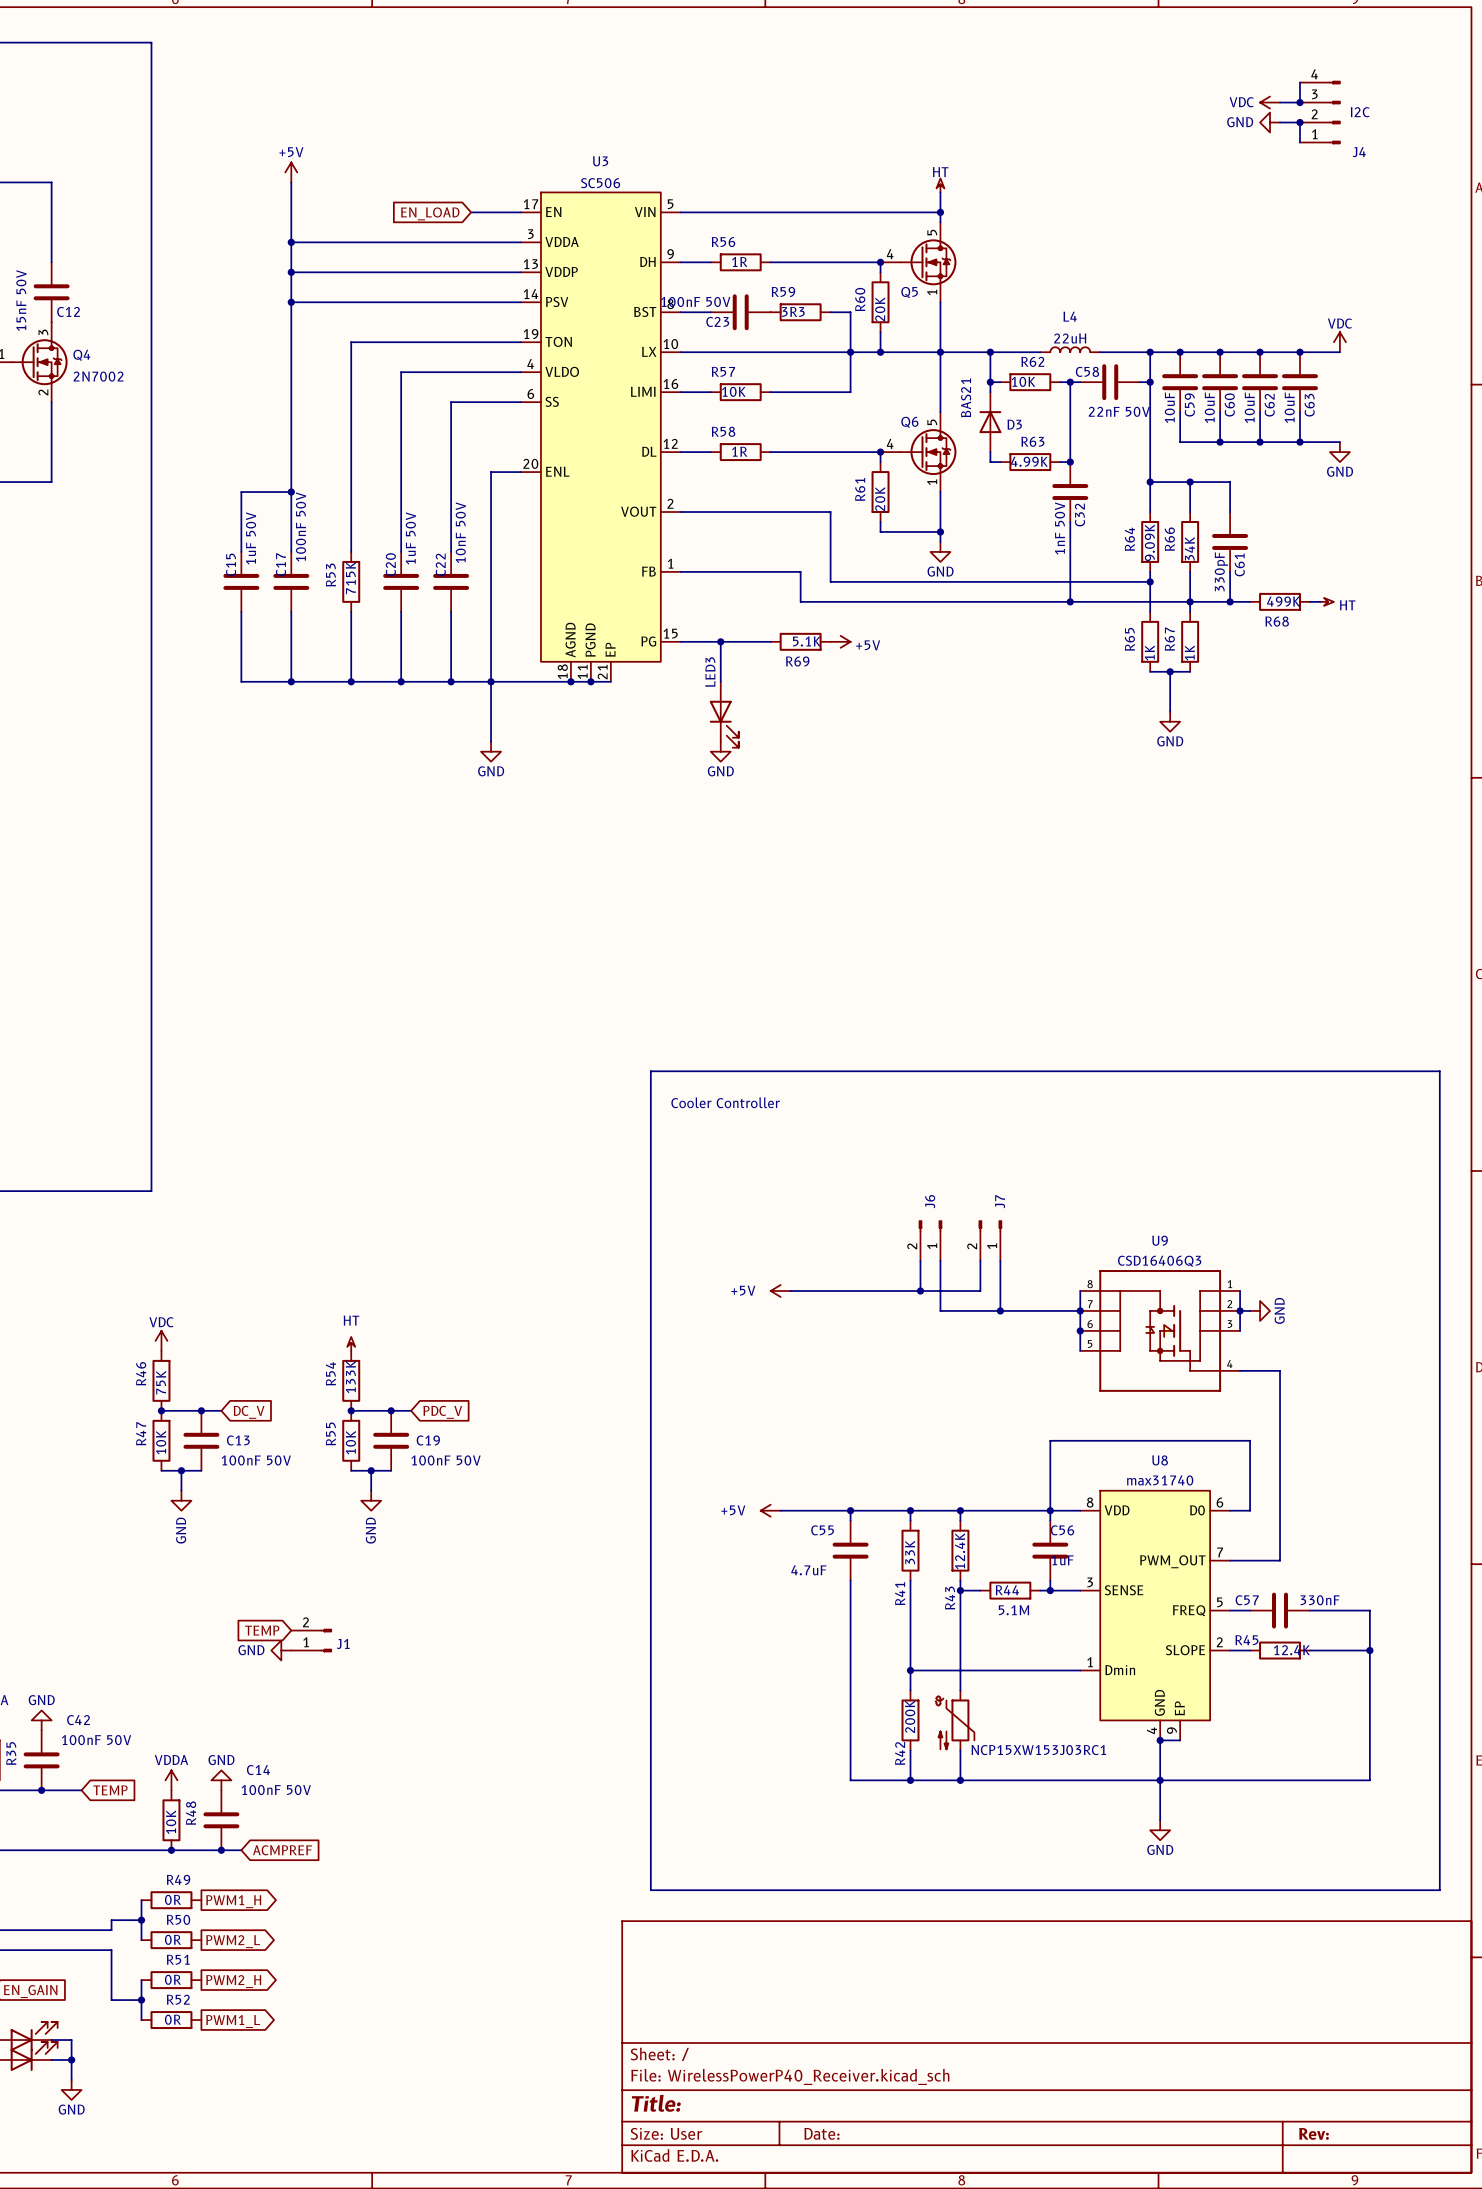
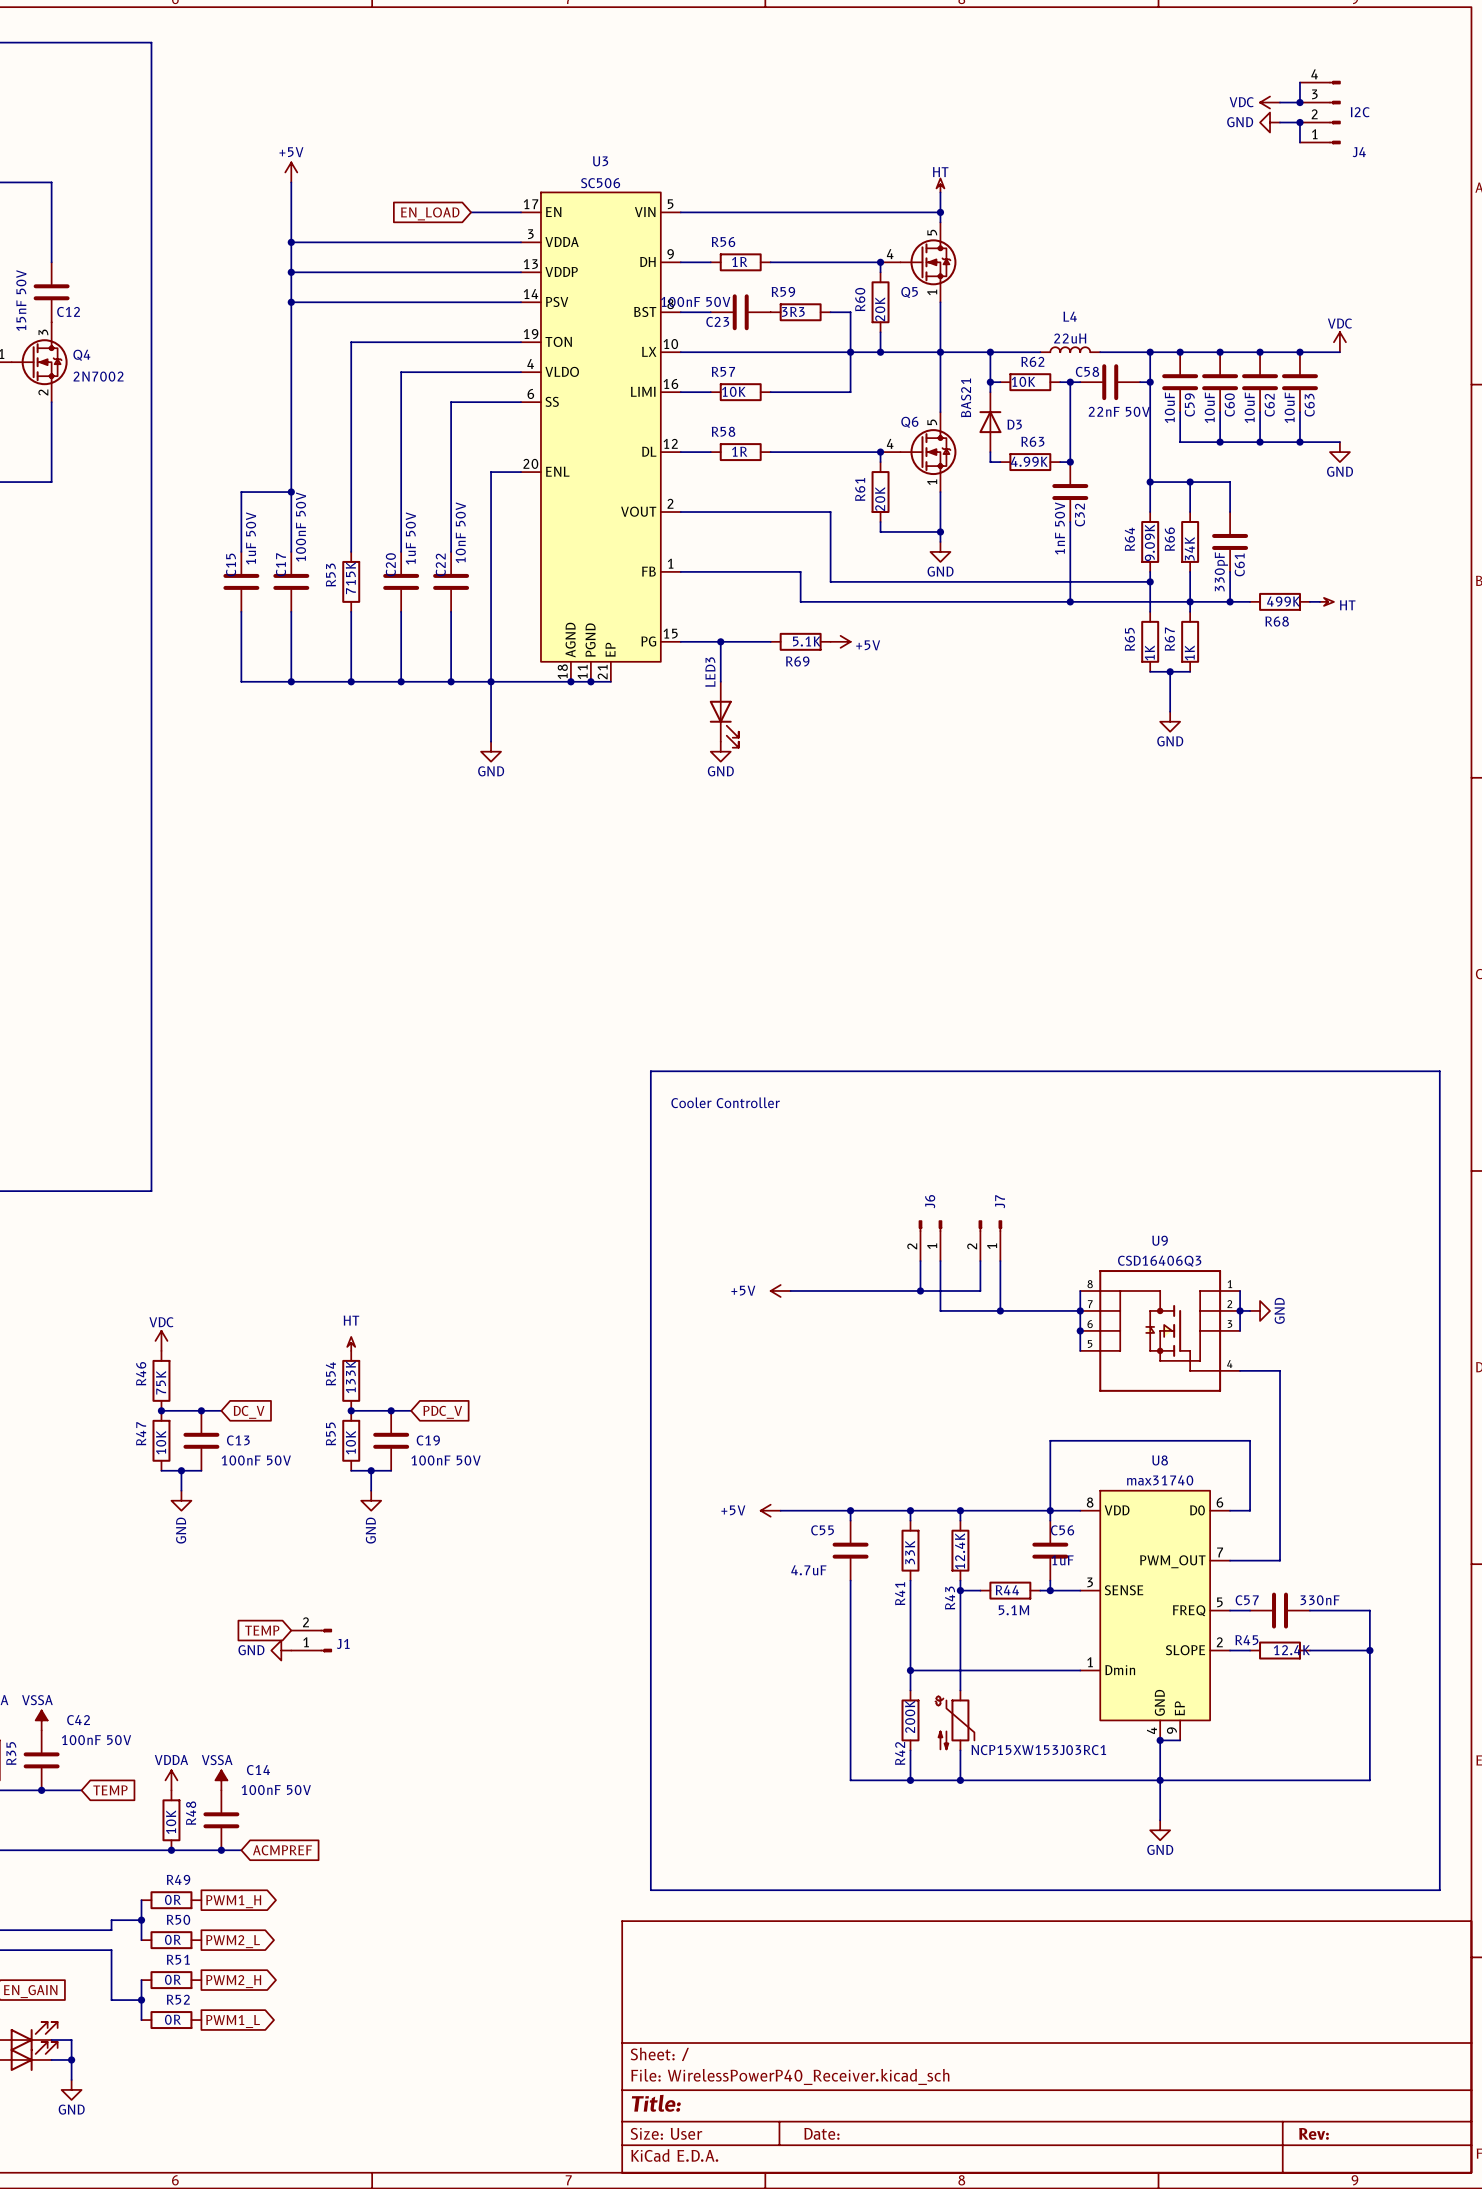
power symbol: GND (41, 1720) -> VSSA (41, 1720)
power symbol: GND (221, 1780) -> VSSA (221, 1780)

